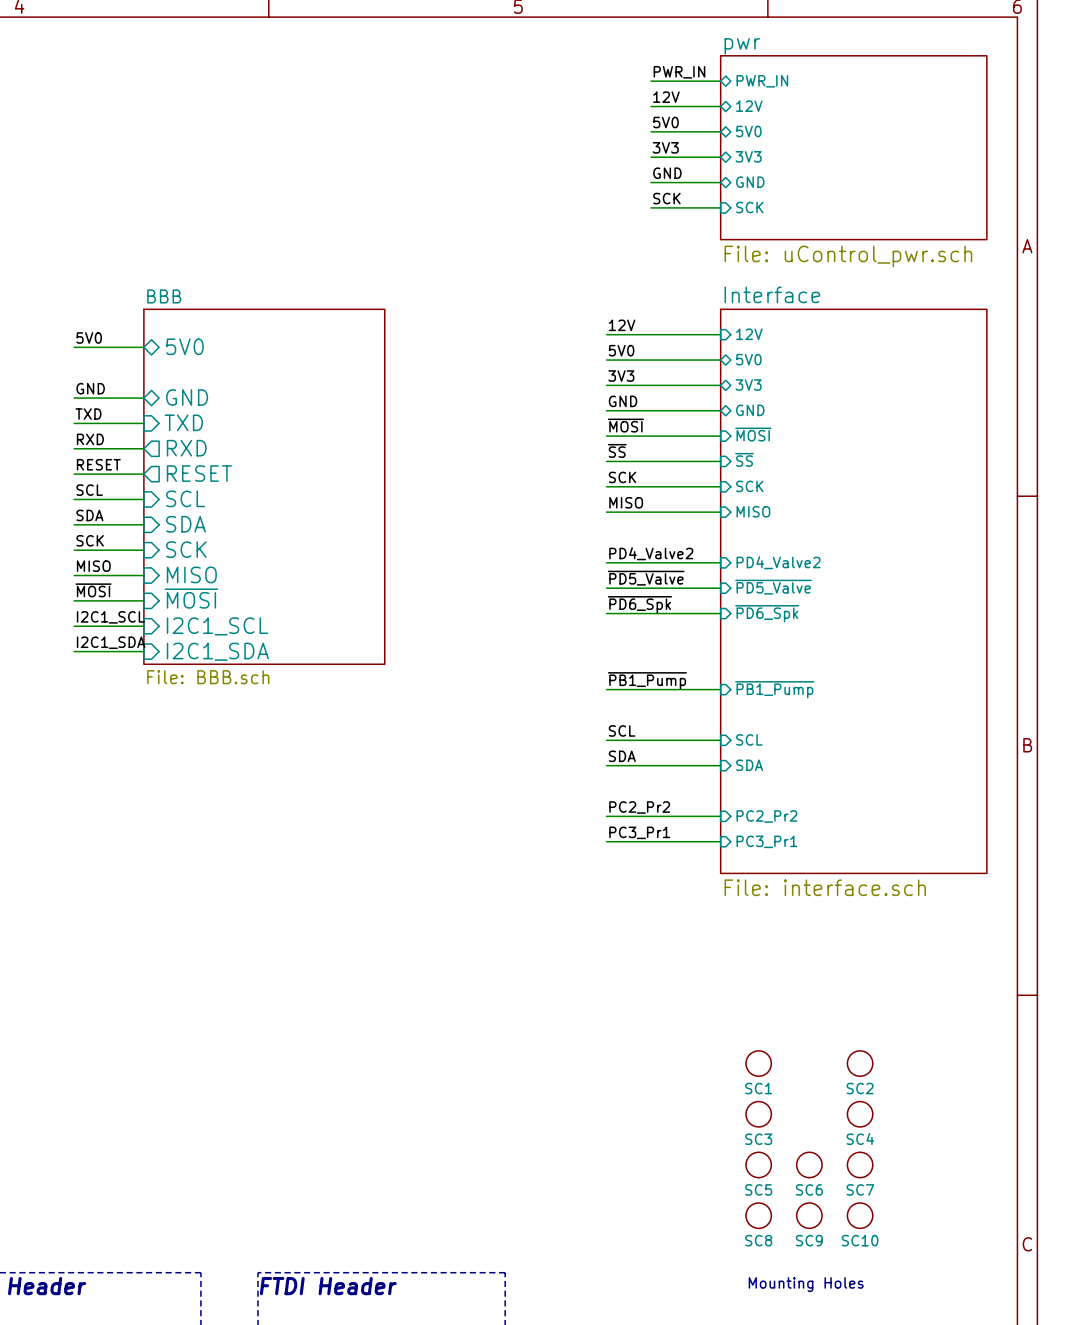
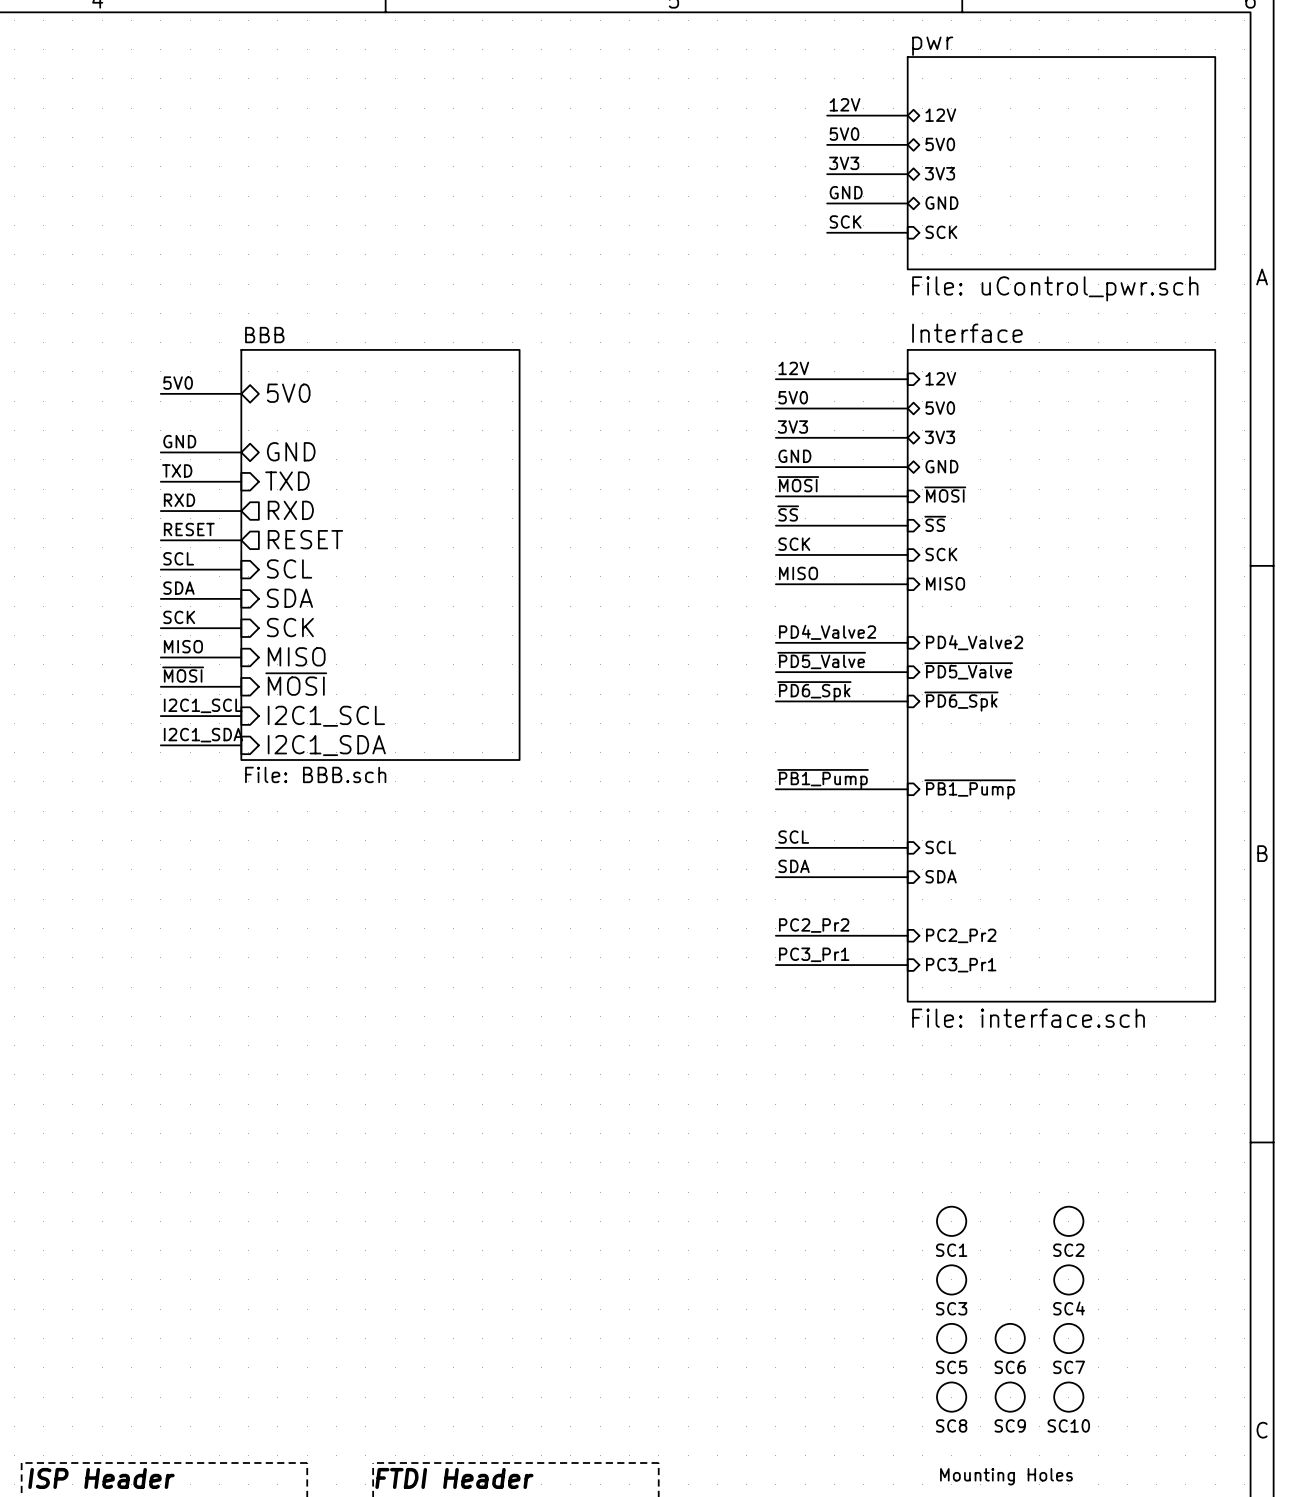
label: PWR_IN (679, 72) -> none
wire: (650, 81) (720, 81) -> none
sheet pin: PWR_IN (762, 81) -> none

